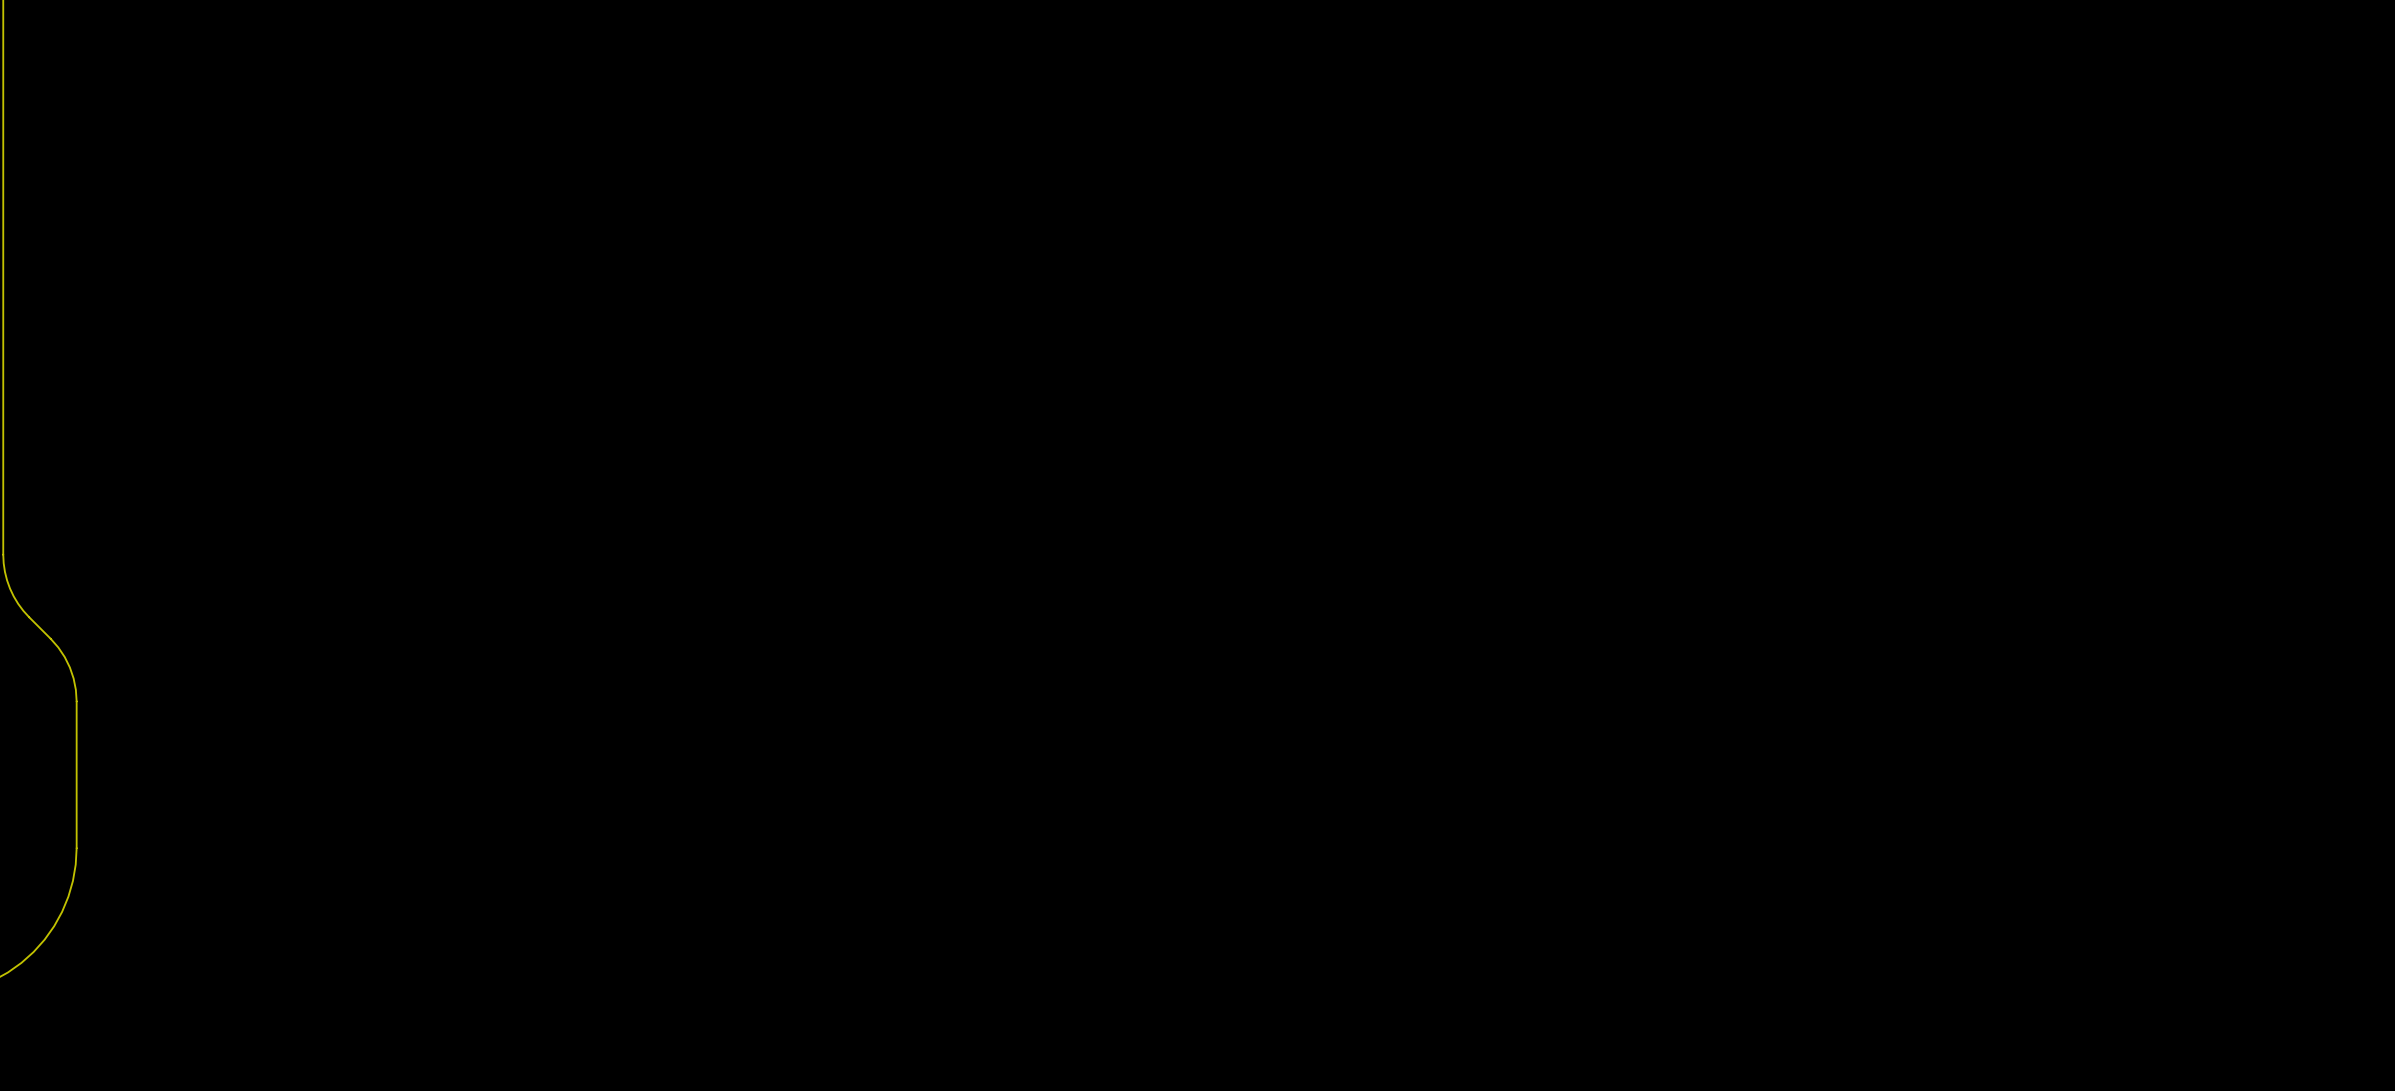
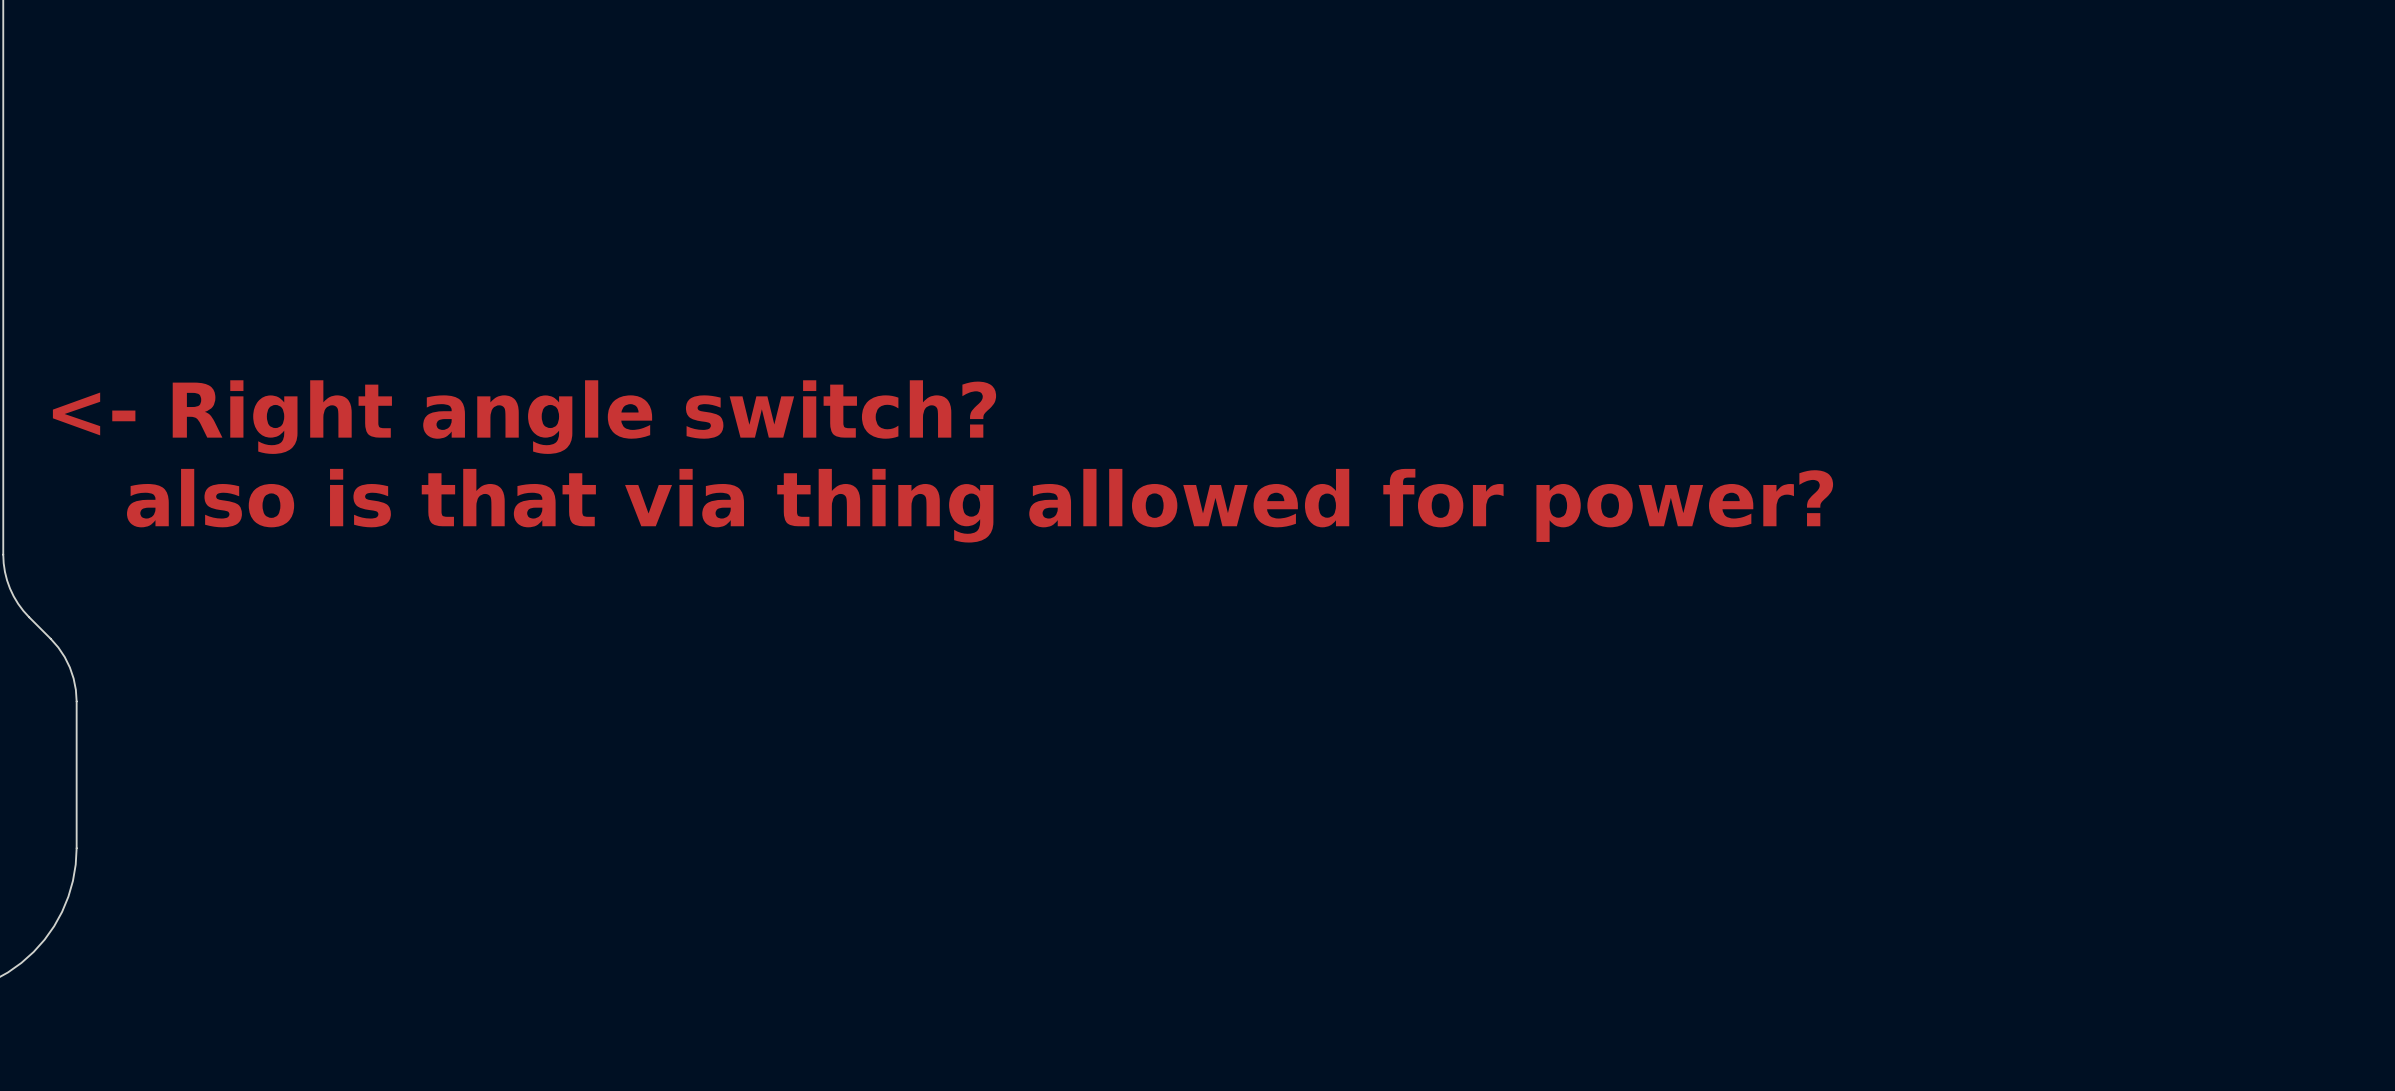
text: none -> <- Right angle switch? (524, 417)
text: none -> also is that via thing allowed for power? (980, 505)

